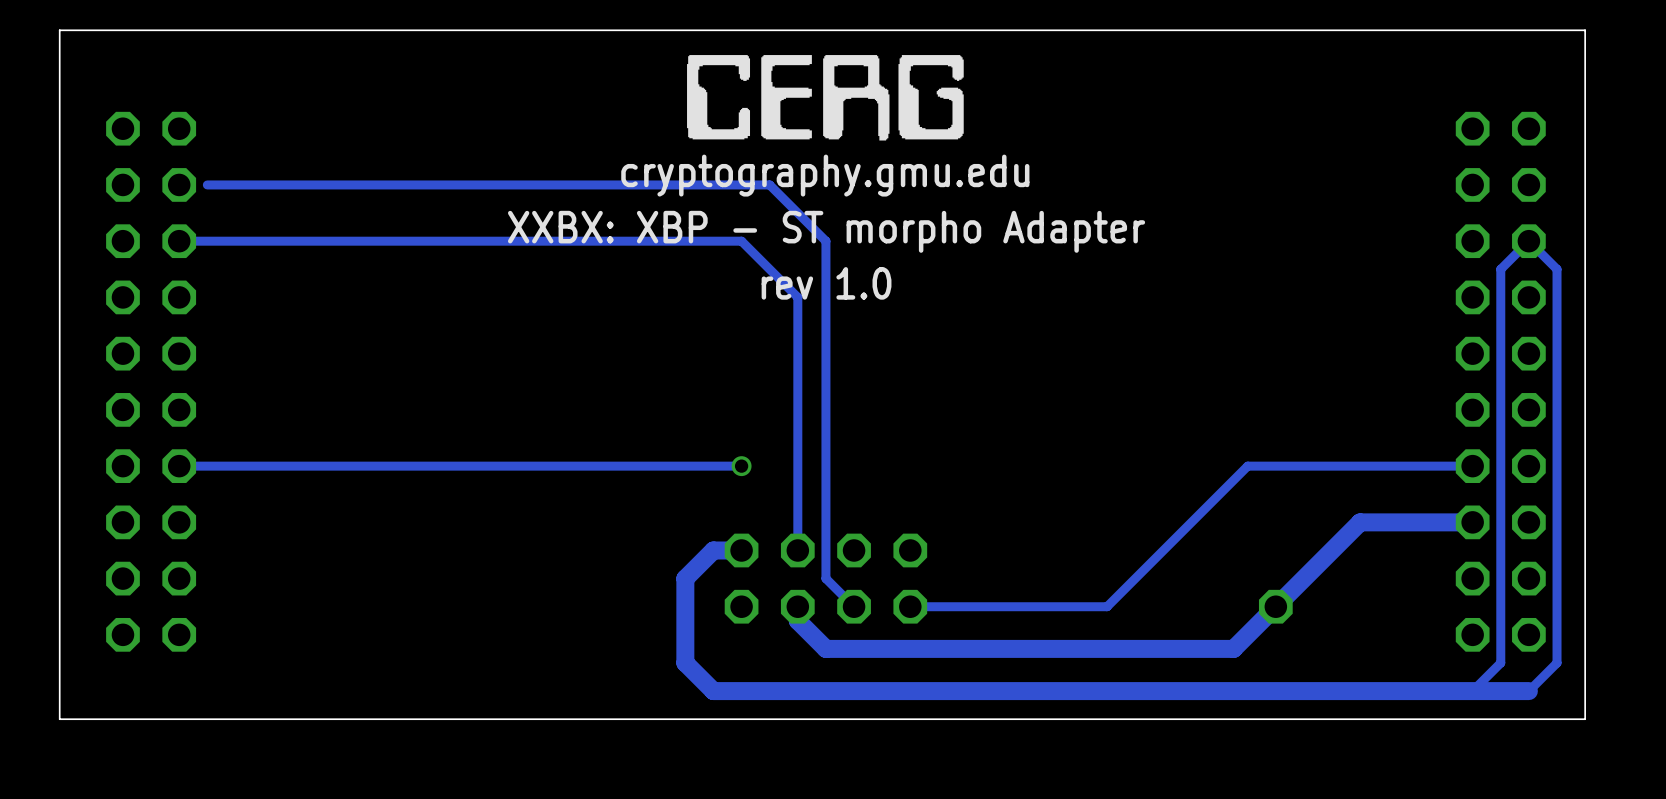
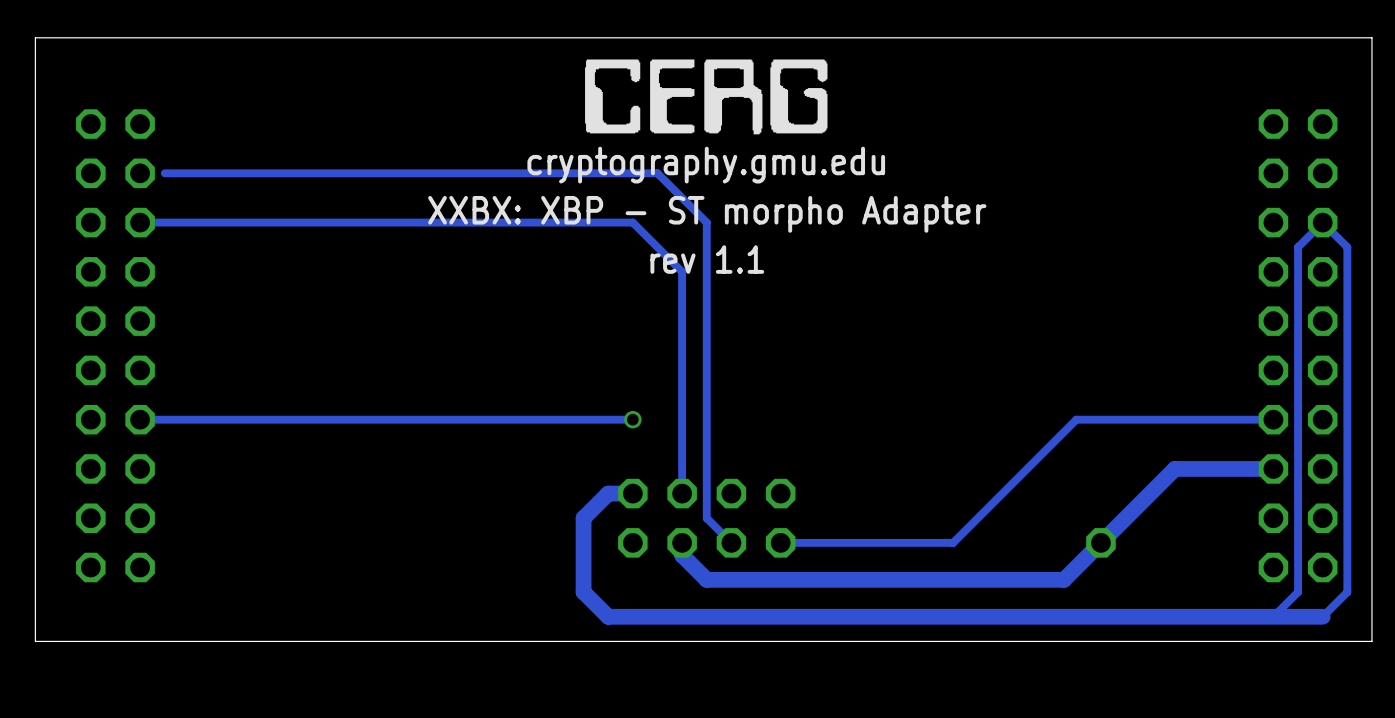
text: rev 1.0 (826, 283) -> rev 1.1 (707, 259)

